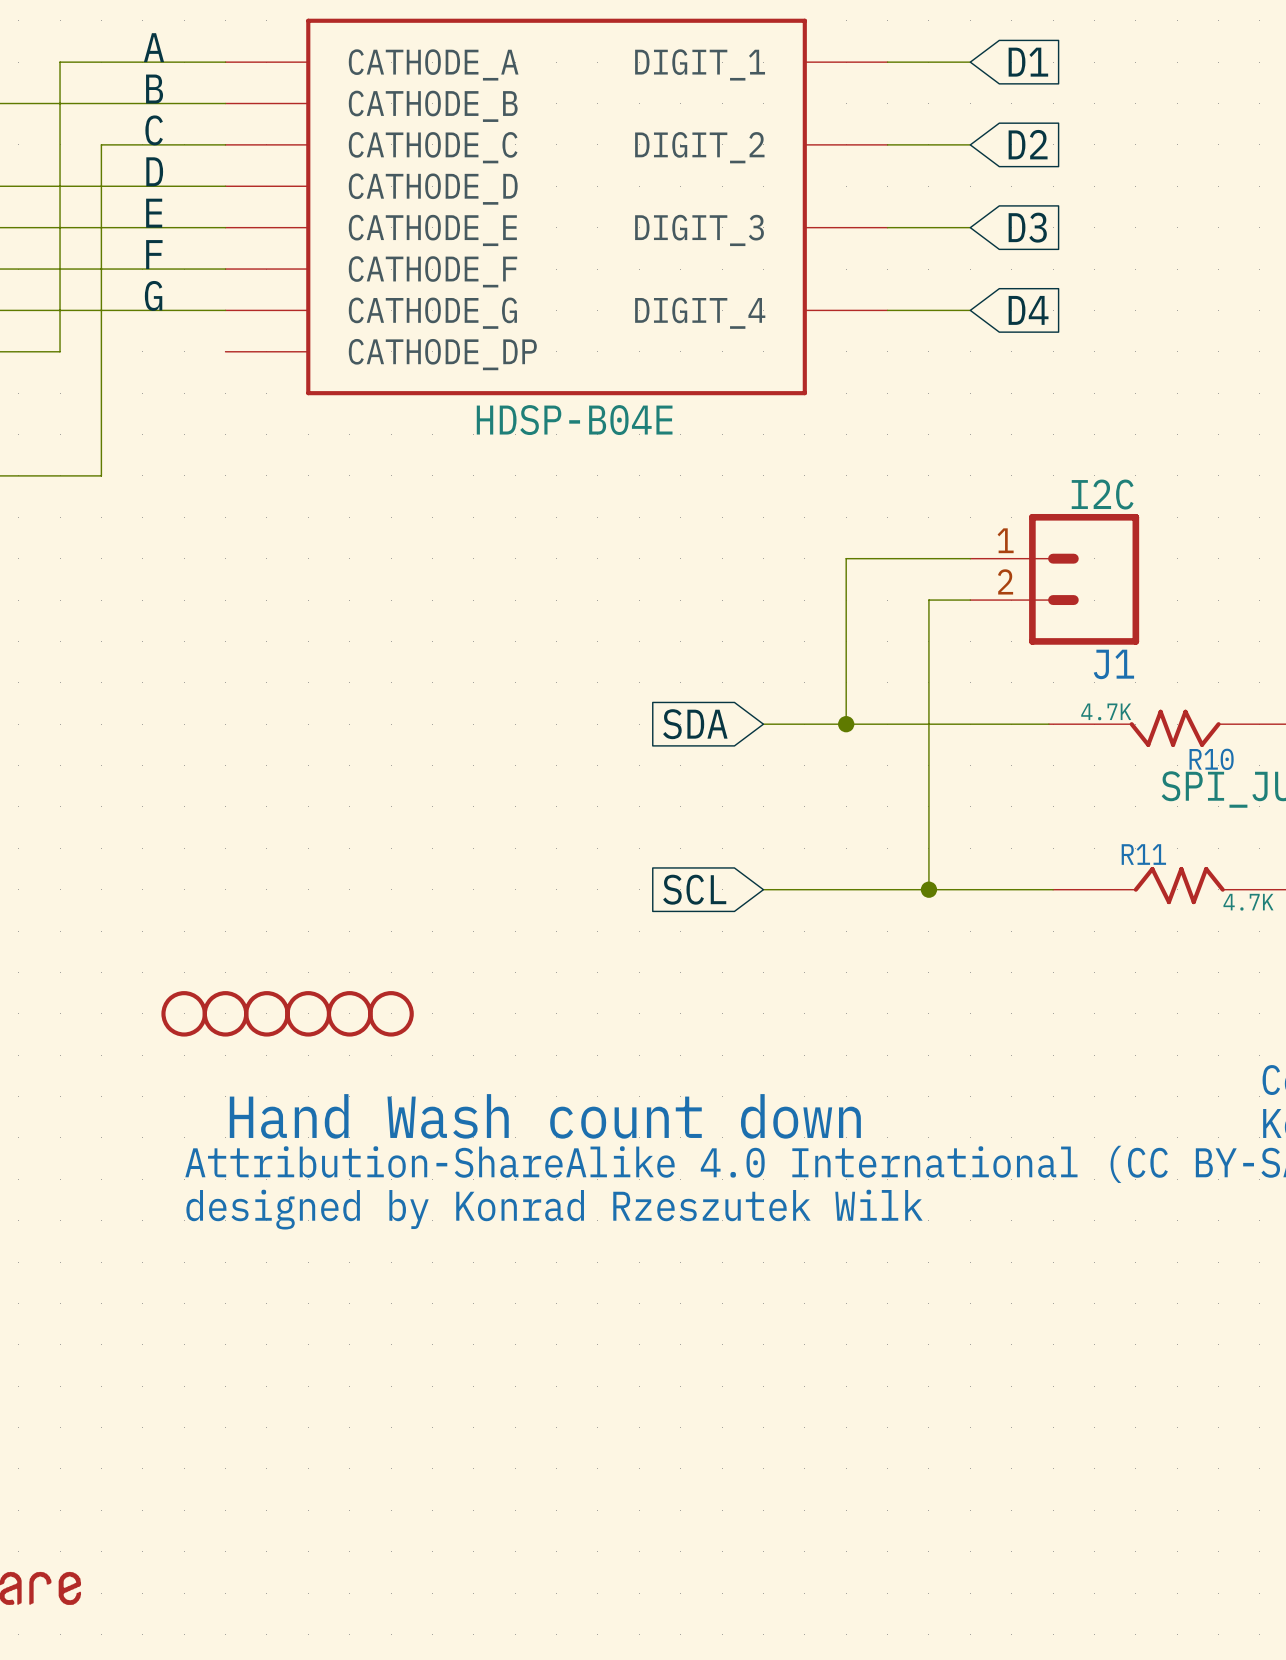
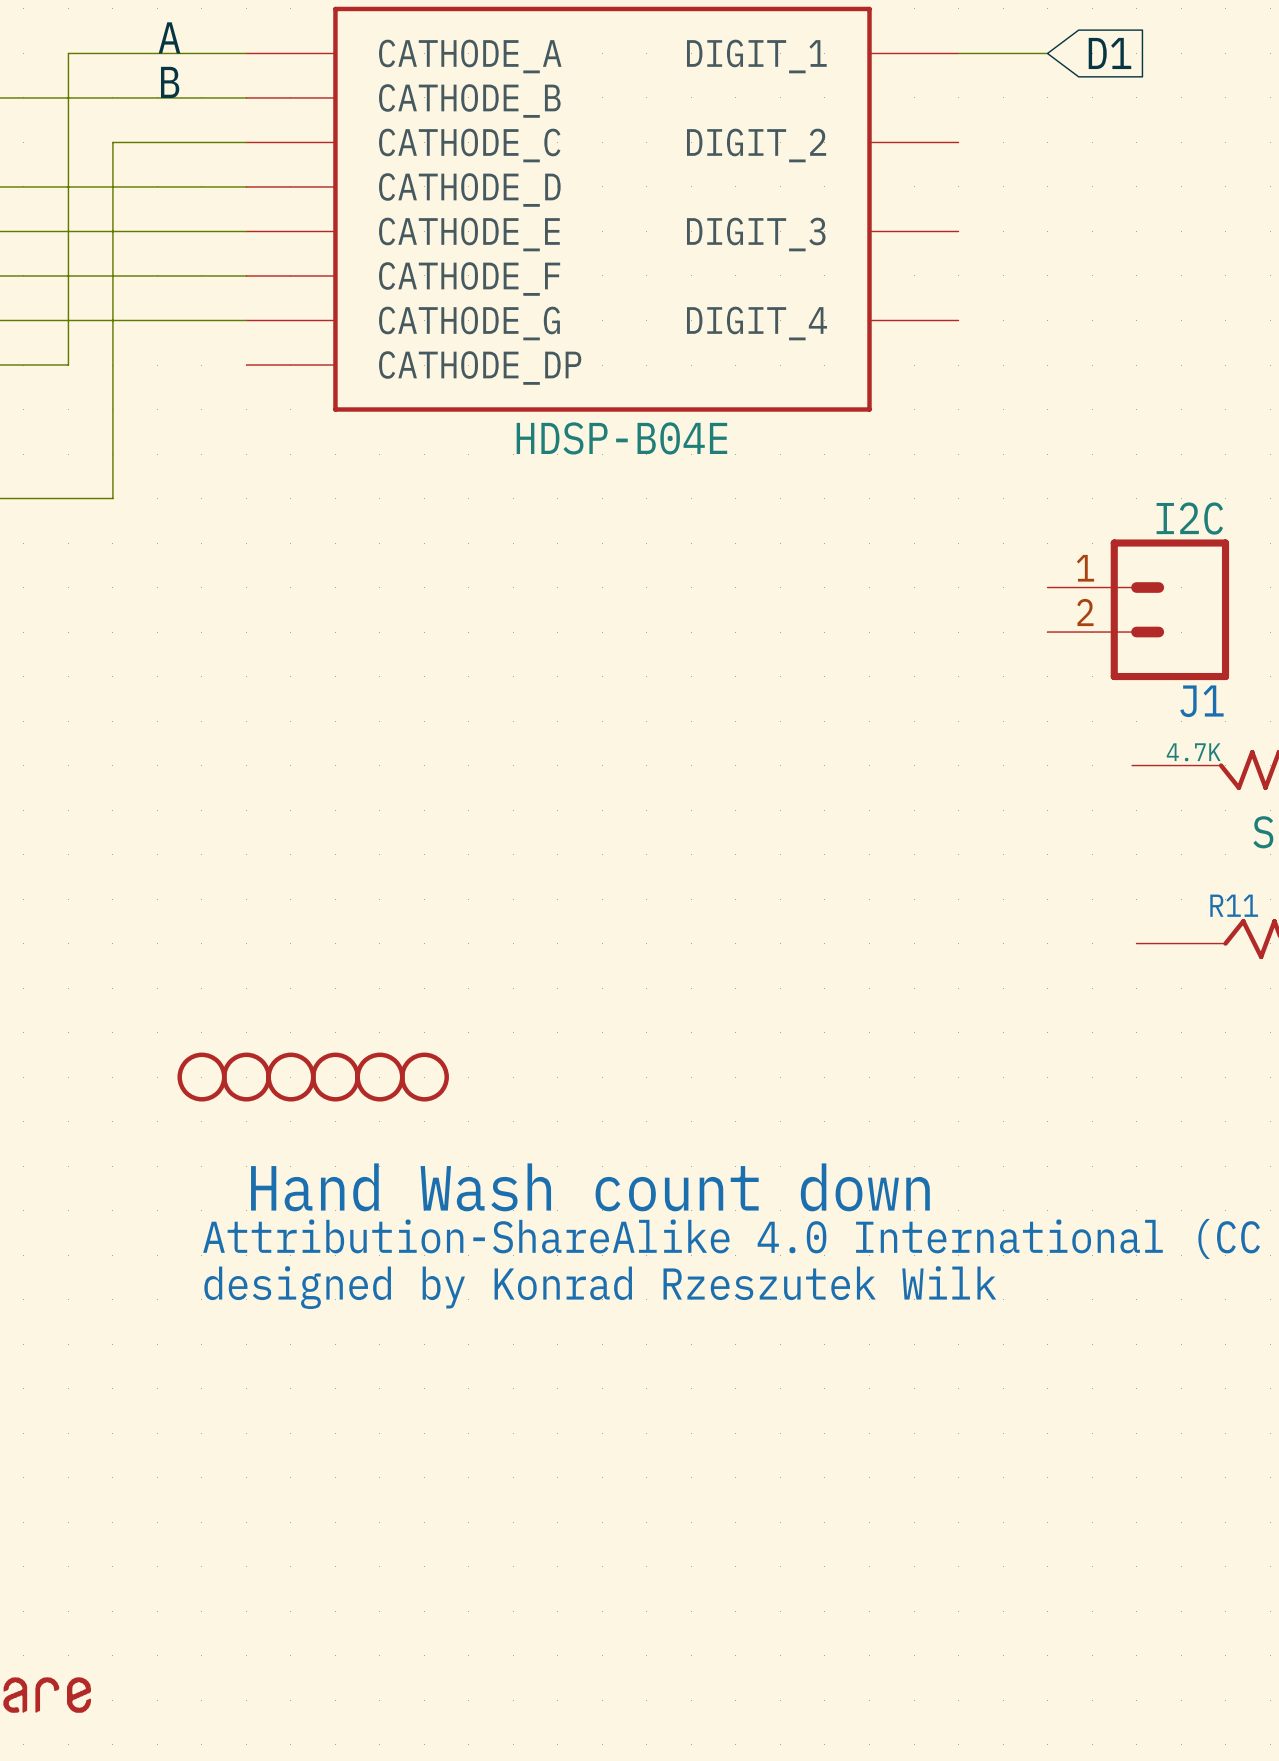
label: C (154, 130) -> none
wire: (887, 144) (970, 144) -> none
global label: D2 (1028, 144) -> none
label: D (154, 171) -> none
label: E (154, 213) -> none
wire: (887, 227) (970, 227) -> none
global label: D3 (1027, 227) -> none
label: F (154, 254) -> none
label: G (153, 295) -> none
wire: (887, 310) (970, 310) -> none
global label: D4 (1028, 310) -> none
wire: (970, 558) (846, 558) (846, 724) -> none
wire: (970, 600) (928, 600) (928, 889) -> none
global label: SDA (695, 724) -> none
wire: (763, 724) (1048, 724) -> none
junction: (846, 724) -> none
global label: SCL (694, 889) -> none
wire: (763, 889) (1053, 889) -> none
junction: (928, 889) -> none

